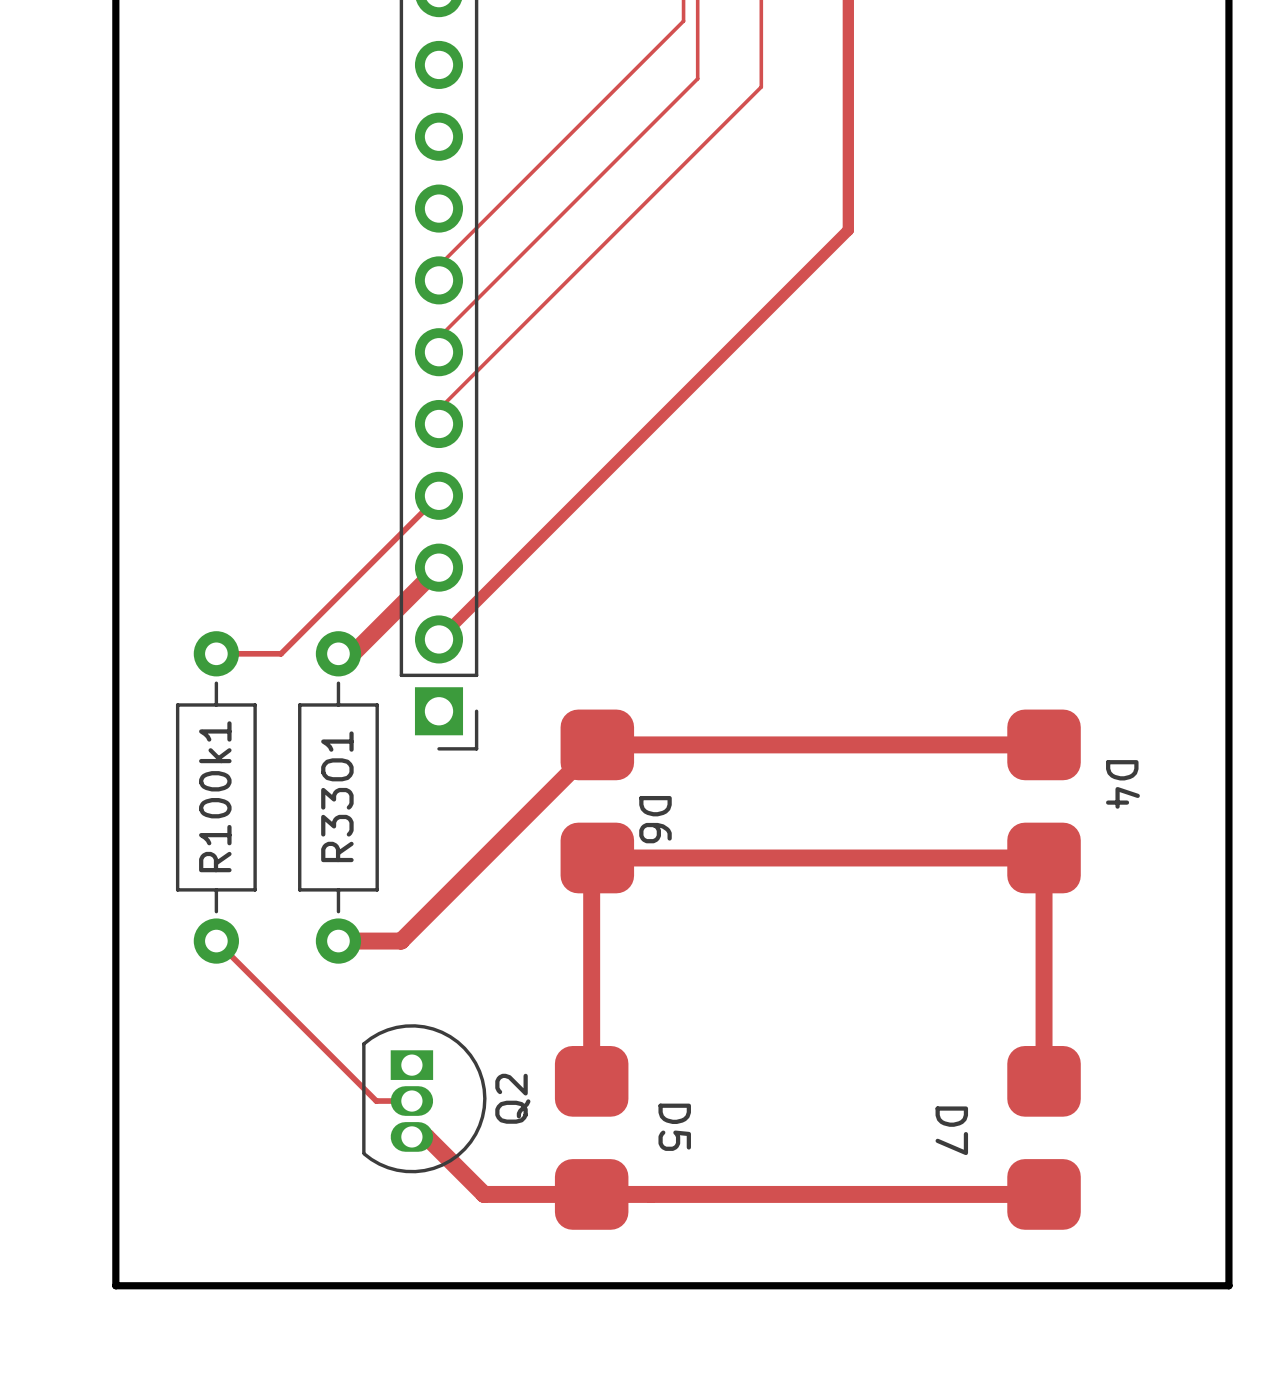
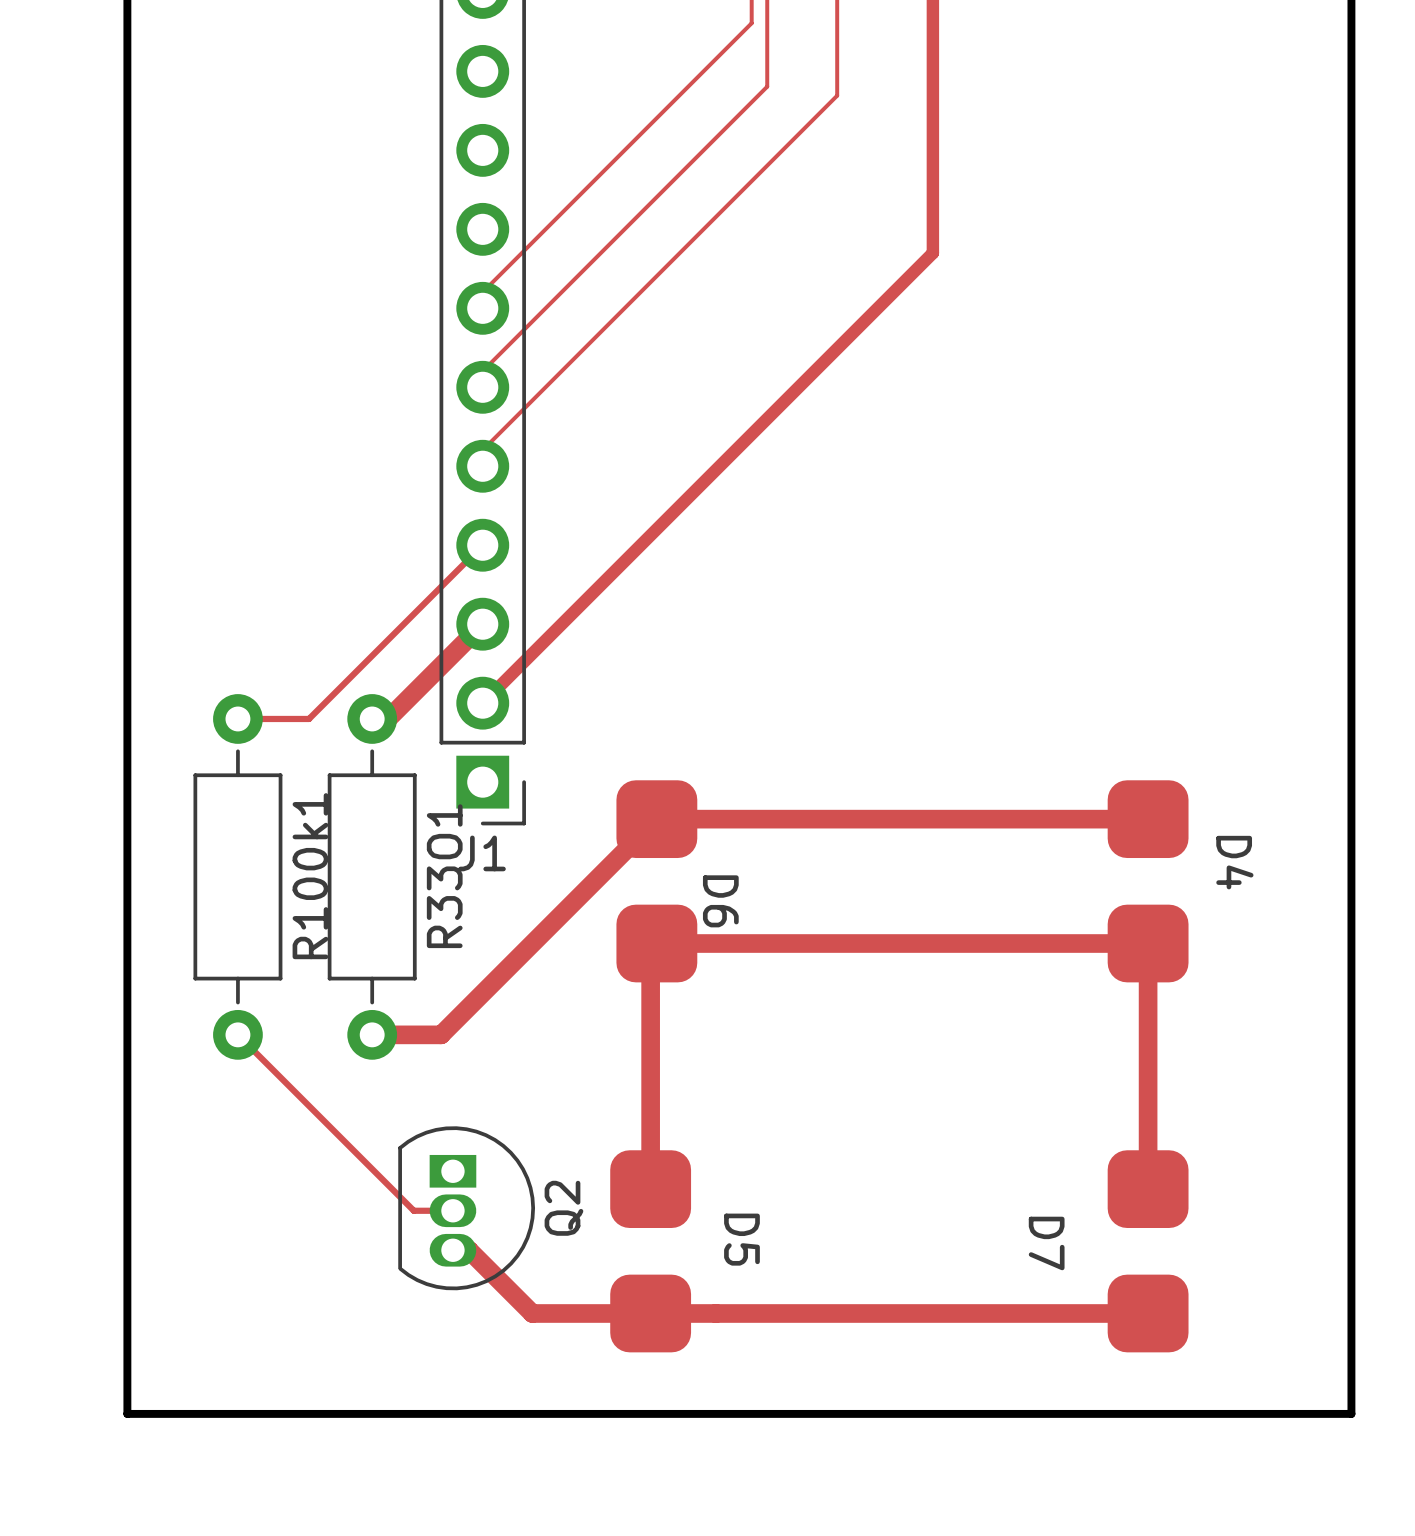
J1 name: none -> J1 (482, 853)
R100k1 name position: R100k1 (215, 796) -> R100k1 (310, 876)
R33O1 name position: R33O1 (337, 796) -> R33O1 (444, 876)

